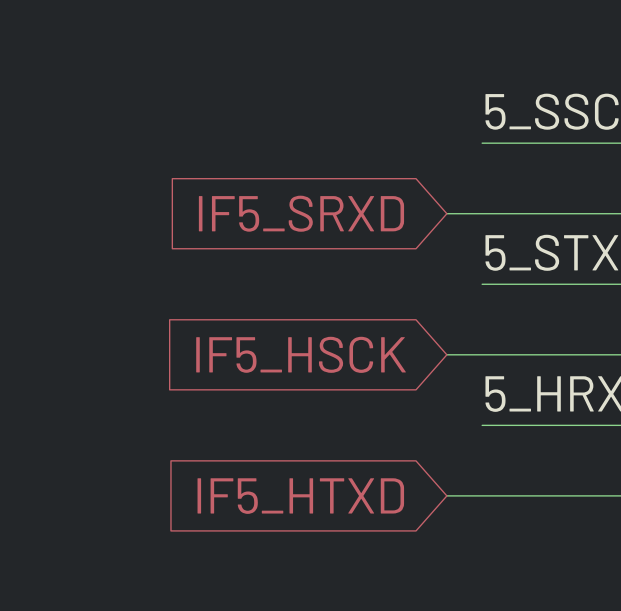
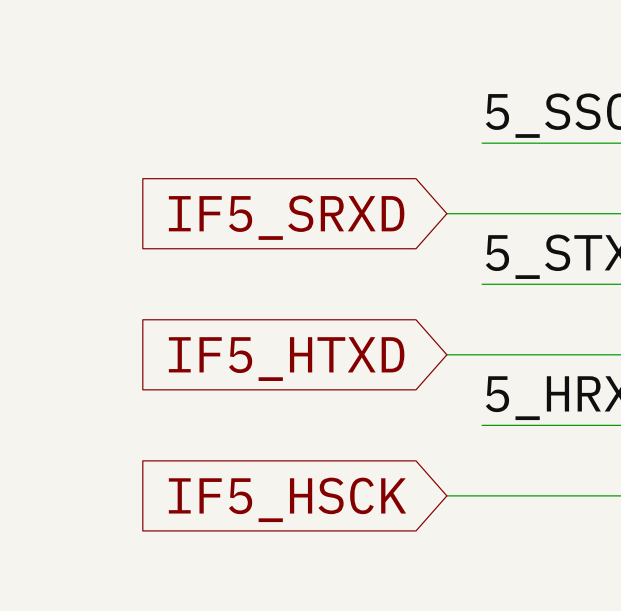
global label: IF5_HSCK (301, 354) -> IF5_HTXD (286, 359)
global label: IF5_HTXD (300, 496) -> IF5_HSCK (287, 499)

